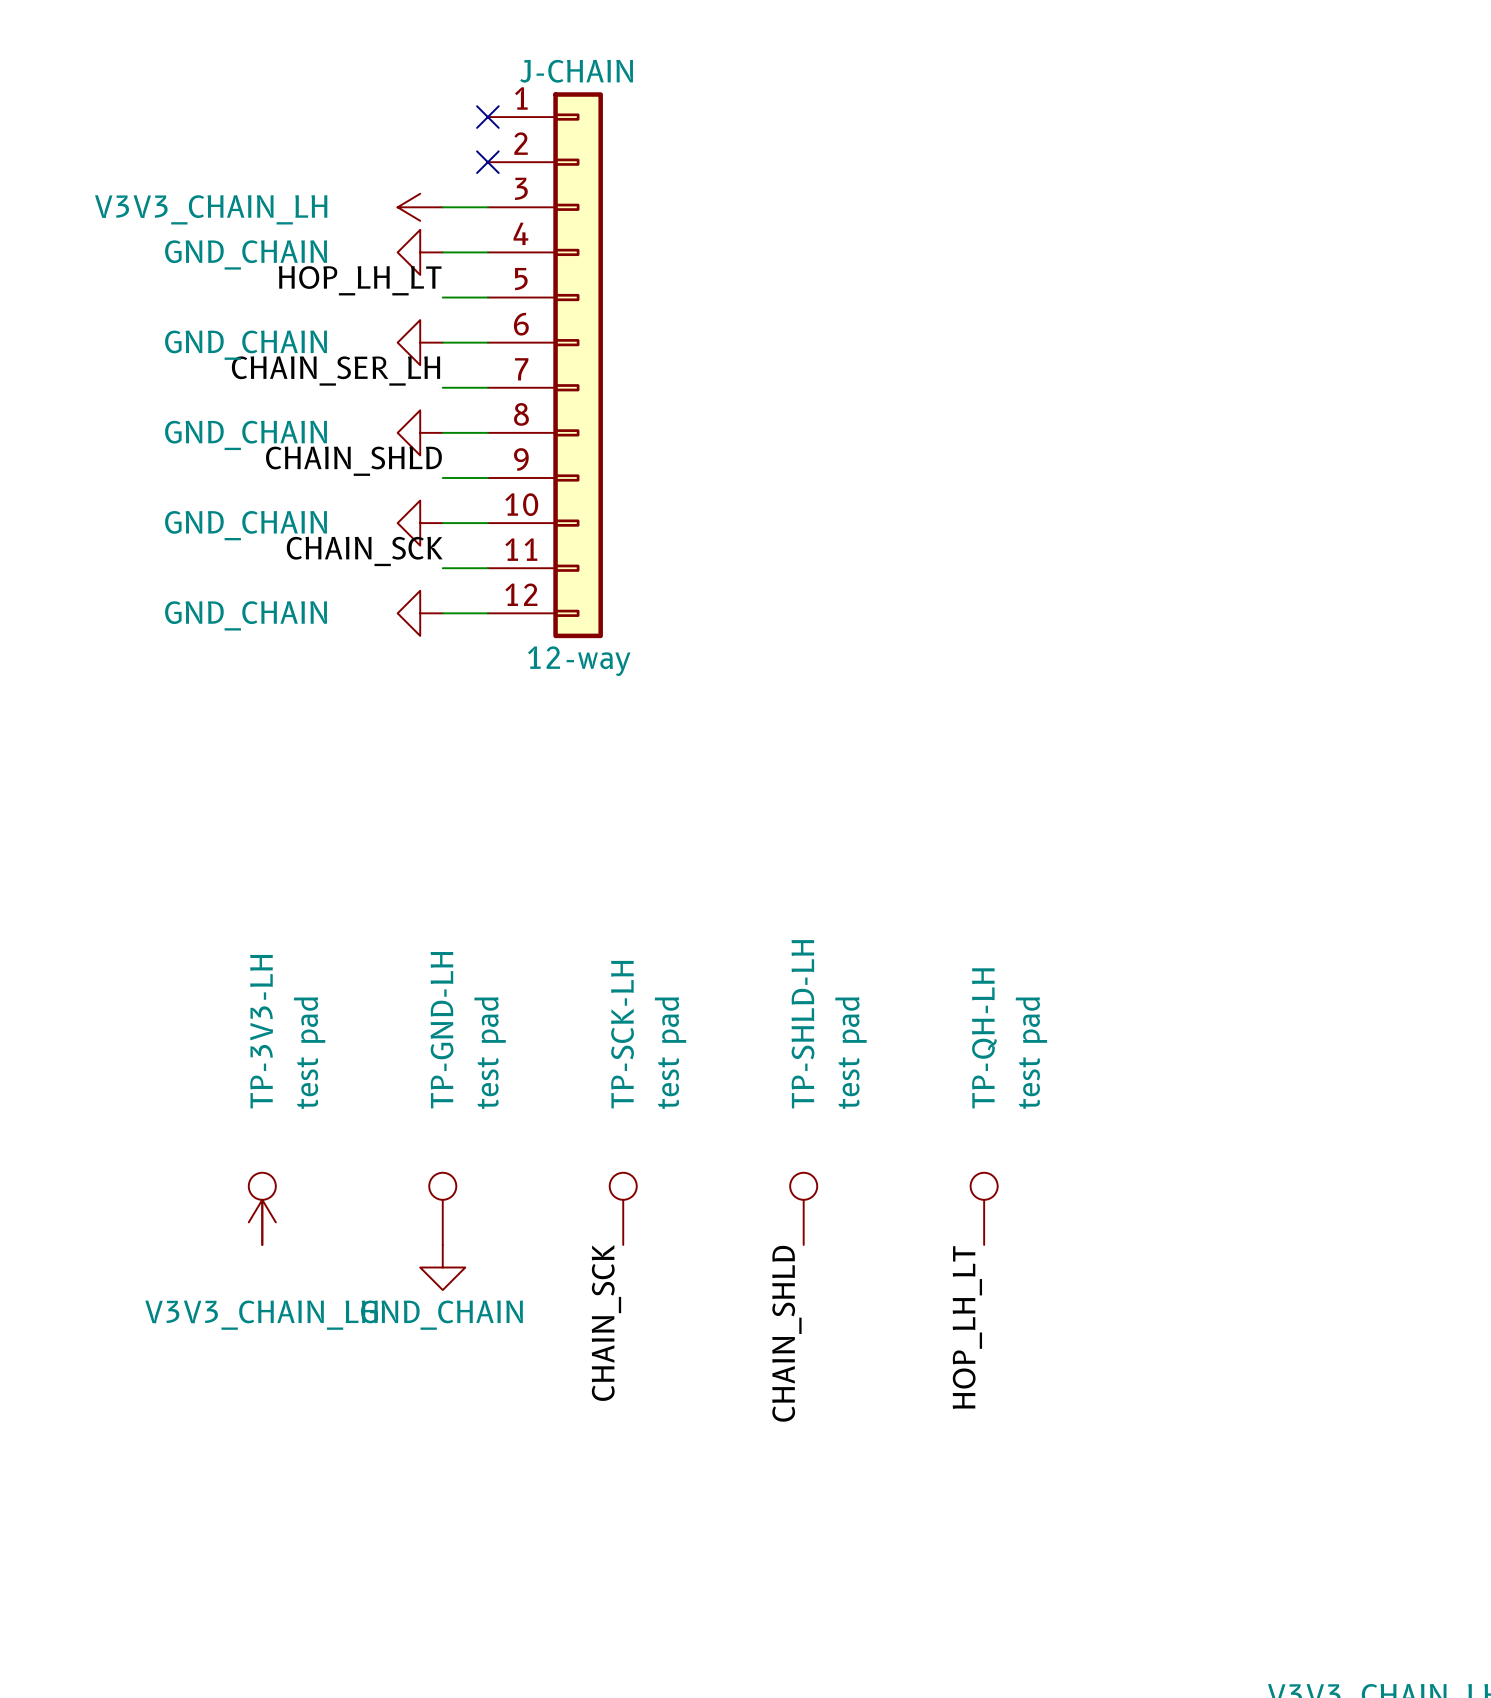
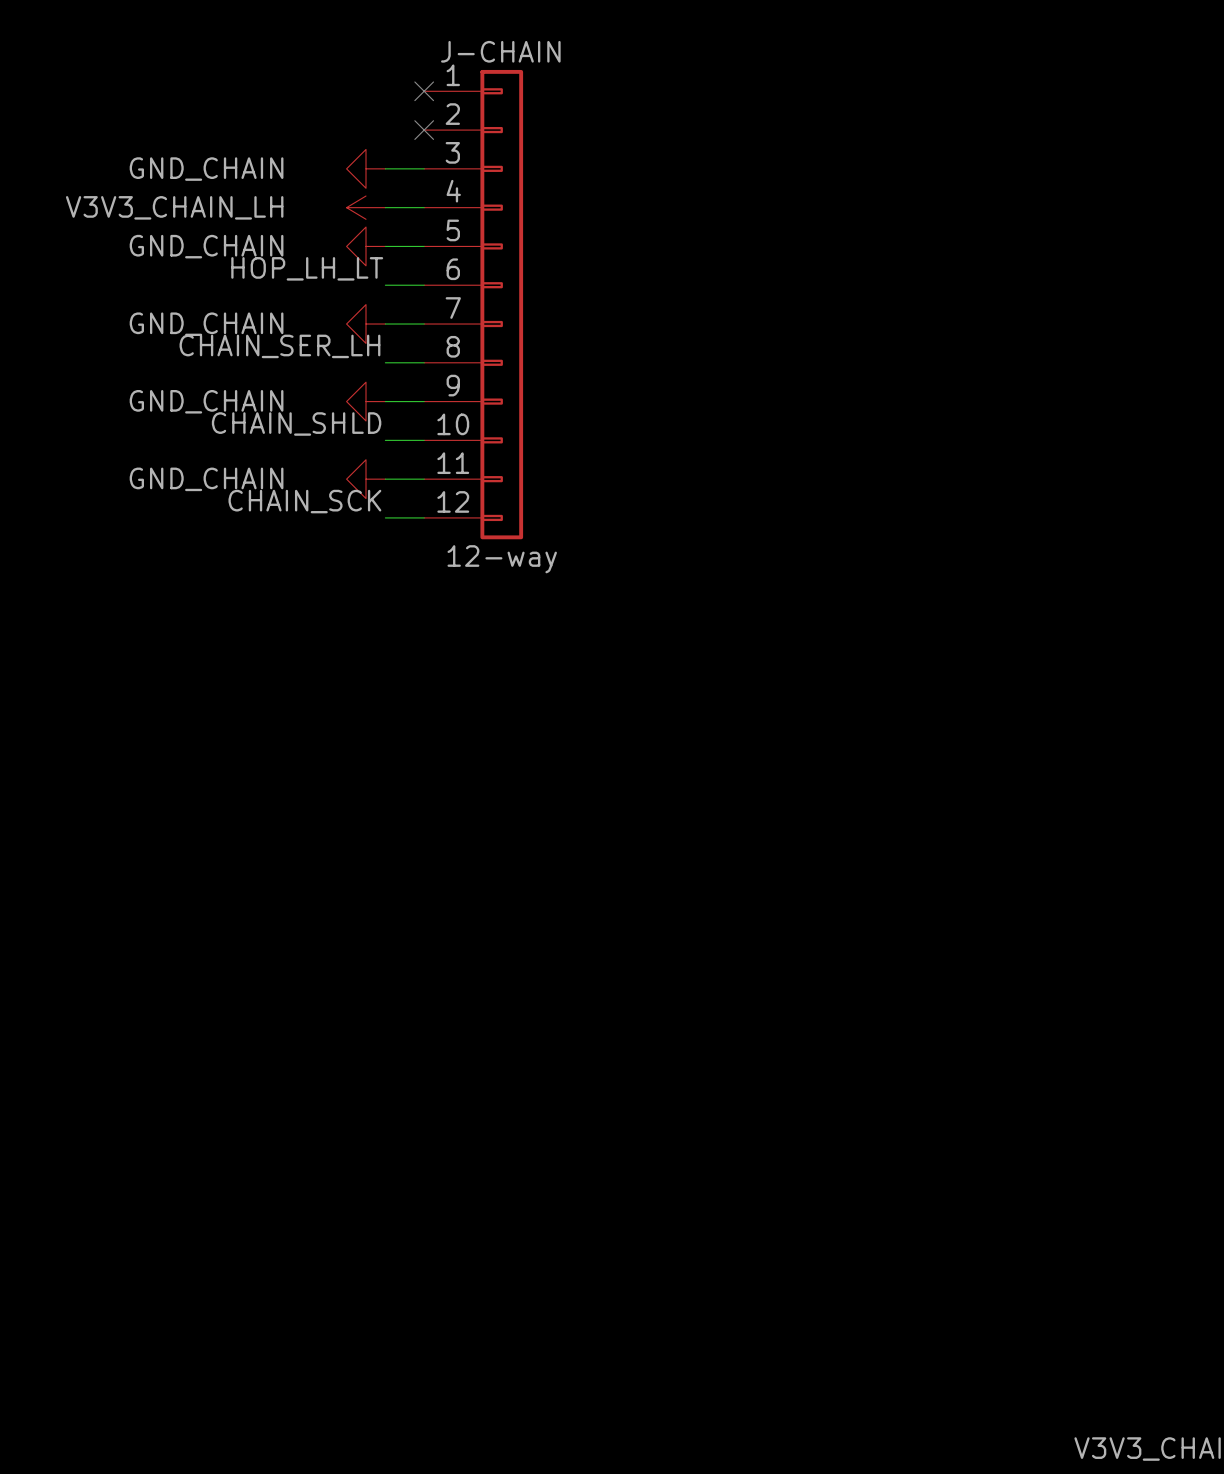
power symbol: V3V3_CHAIN_LH (420, 207) -> GND_CHAIN (366, 168)
power symbol: GND_CHAIN (420, 252) -> V3V3_CHAIN_LH (366, 207)
label position: HOP_LH_LT (360, 280) -> HOP_LH_LT (307, 268)
power symbol: none -> GND_CHAIN (366, 246)
power symbol: GND_CHAIN (420, 342) -> none
label position: CHAIN_SER_LH (335, 371) -> CHAIN_SER_LH (279, 346)
power symbol: none -> GND_CHAIN (366, 324)
power symbol: GND_CHAIN (420, 432) -> none
label position: CHAIN_SHLD (353, 461) -> CHAIN_SHLD (296, 423)
power symbol: none -> GND_CHAIN (366, 401)
power symbol: GND_CHAIN (420, 523) -> none
label position: CHAIN_SCK (364, 551) -> CHAIN_SCK (304, 501)
power symbol: none -> GND_CHAIN (366, 479)
power symbol: GND_CHAIN (420, 613) -> none
TP-3V3-LH: test pad (262, 1208) -> none
TP-GND-LH: test pad (442, 1208) -> none
TP-SCK-LH: test pad (623, 1208) -> none
TP-SHLD-LH: test pad (803, 1208) -> none
TP-QH-LH: test pad (984, 1208) -> none
power symbol: V3V3_CHAIN_LH (262, 1222) -> none
power symbol: GND_CHAIN (442, 1267) -> none
label: CHAIN_SCK (606, 1323) -> none
label: HOP_LH_LT (967, 1327) -> none
label: CHAIN_SHLD (786, 1333) -> none

